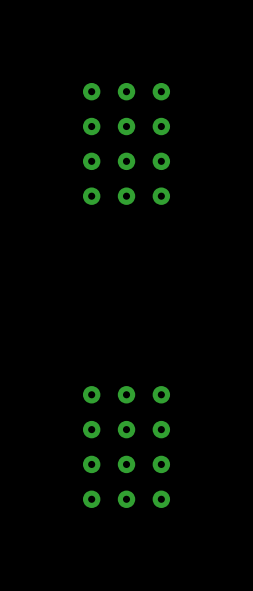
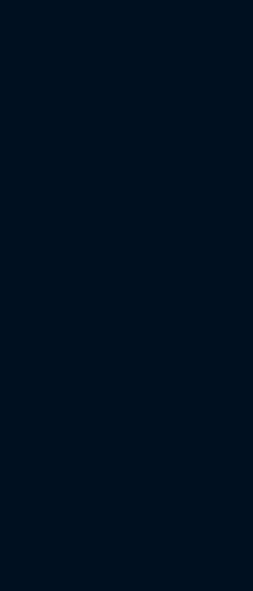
part: (126, 143) -> none
part: (126, 447) -> none

